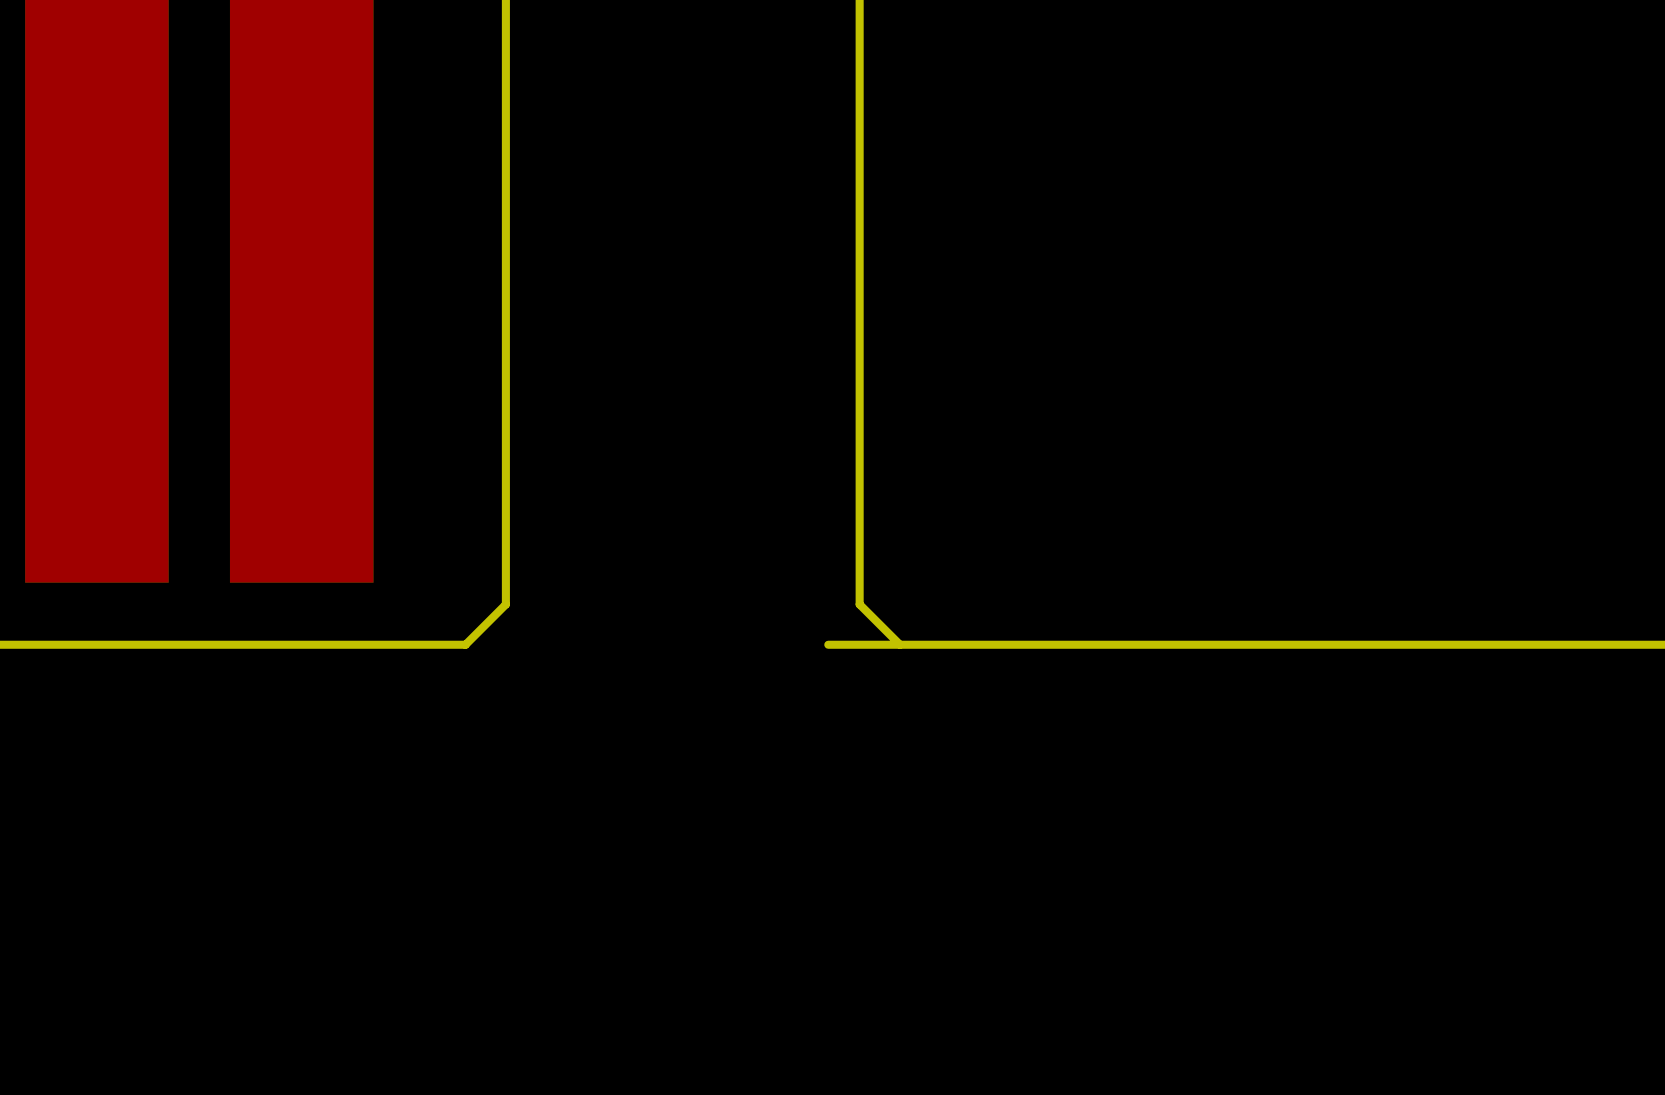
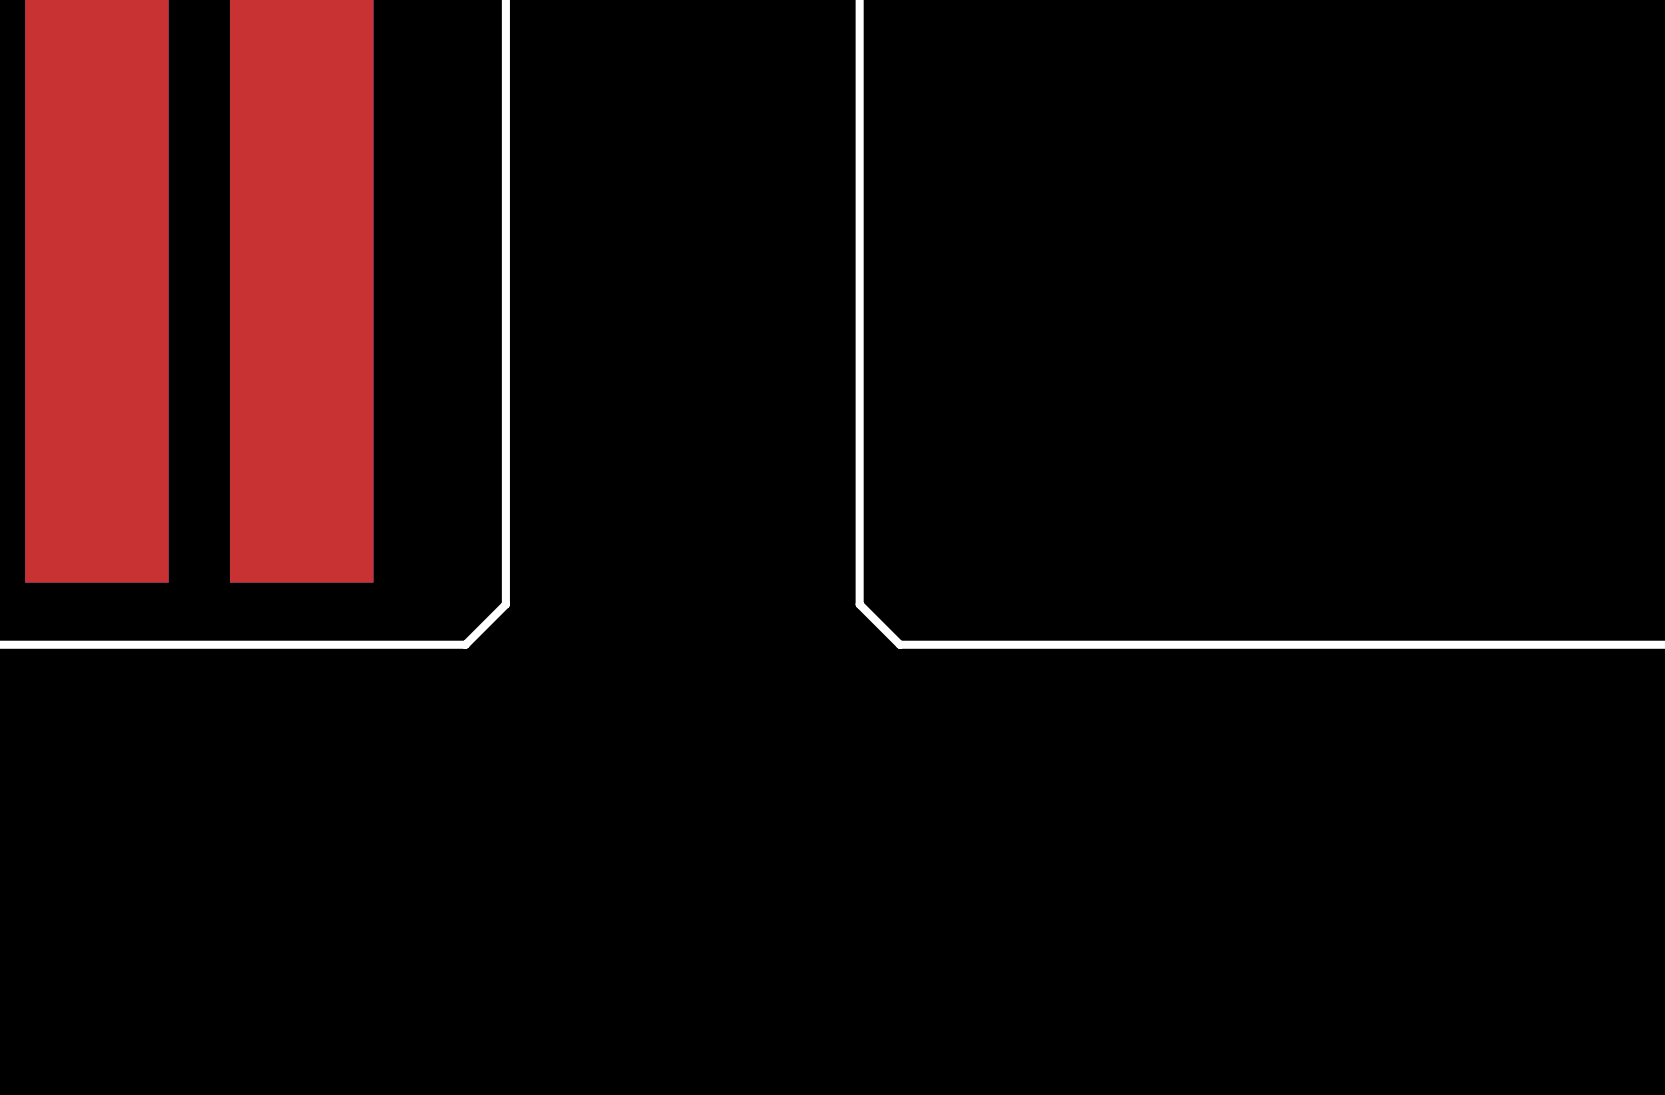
board edge: (828, 644) (899, 644) -> none

